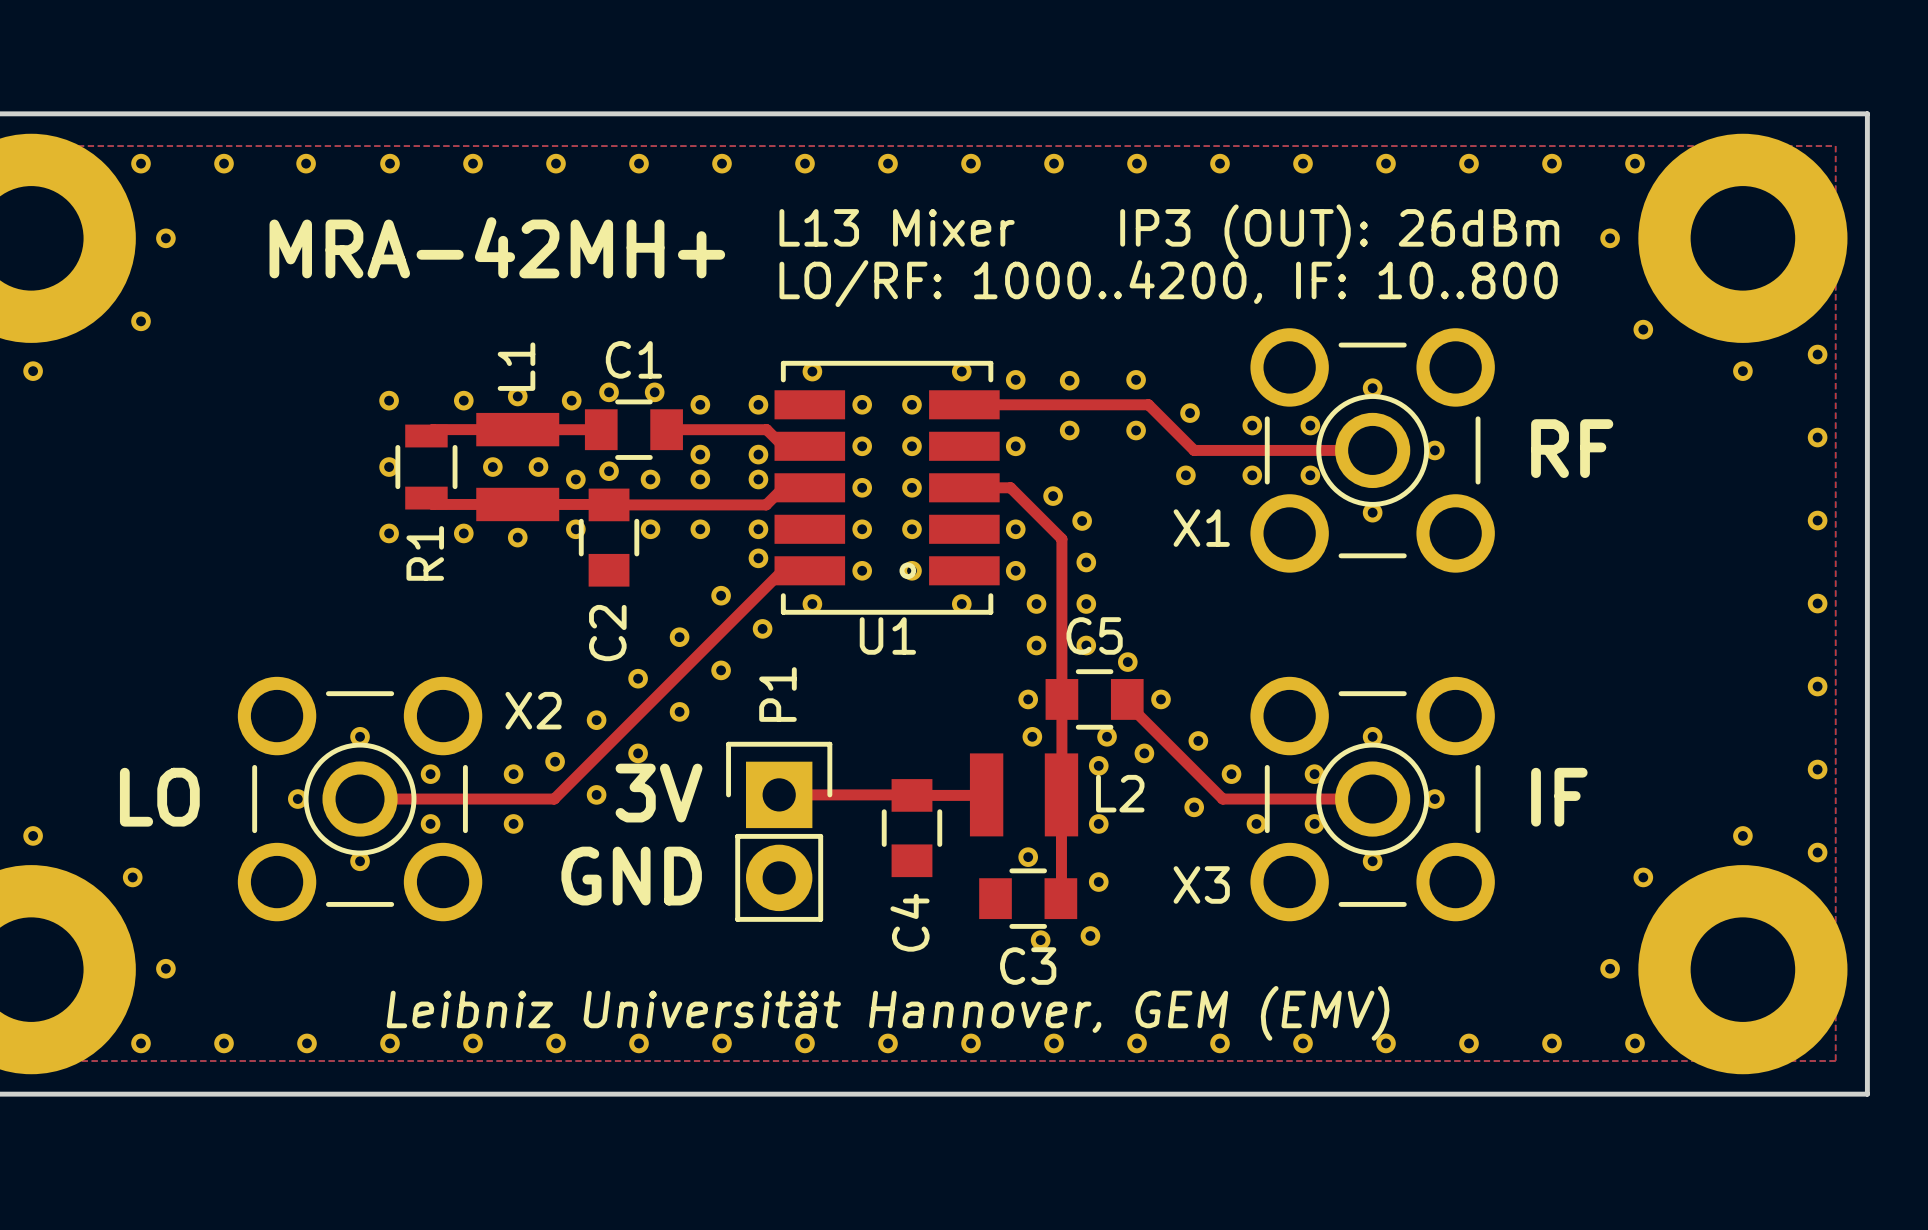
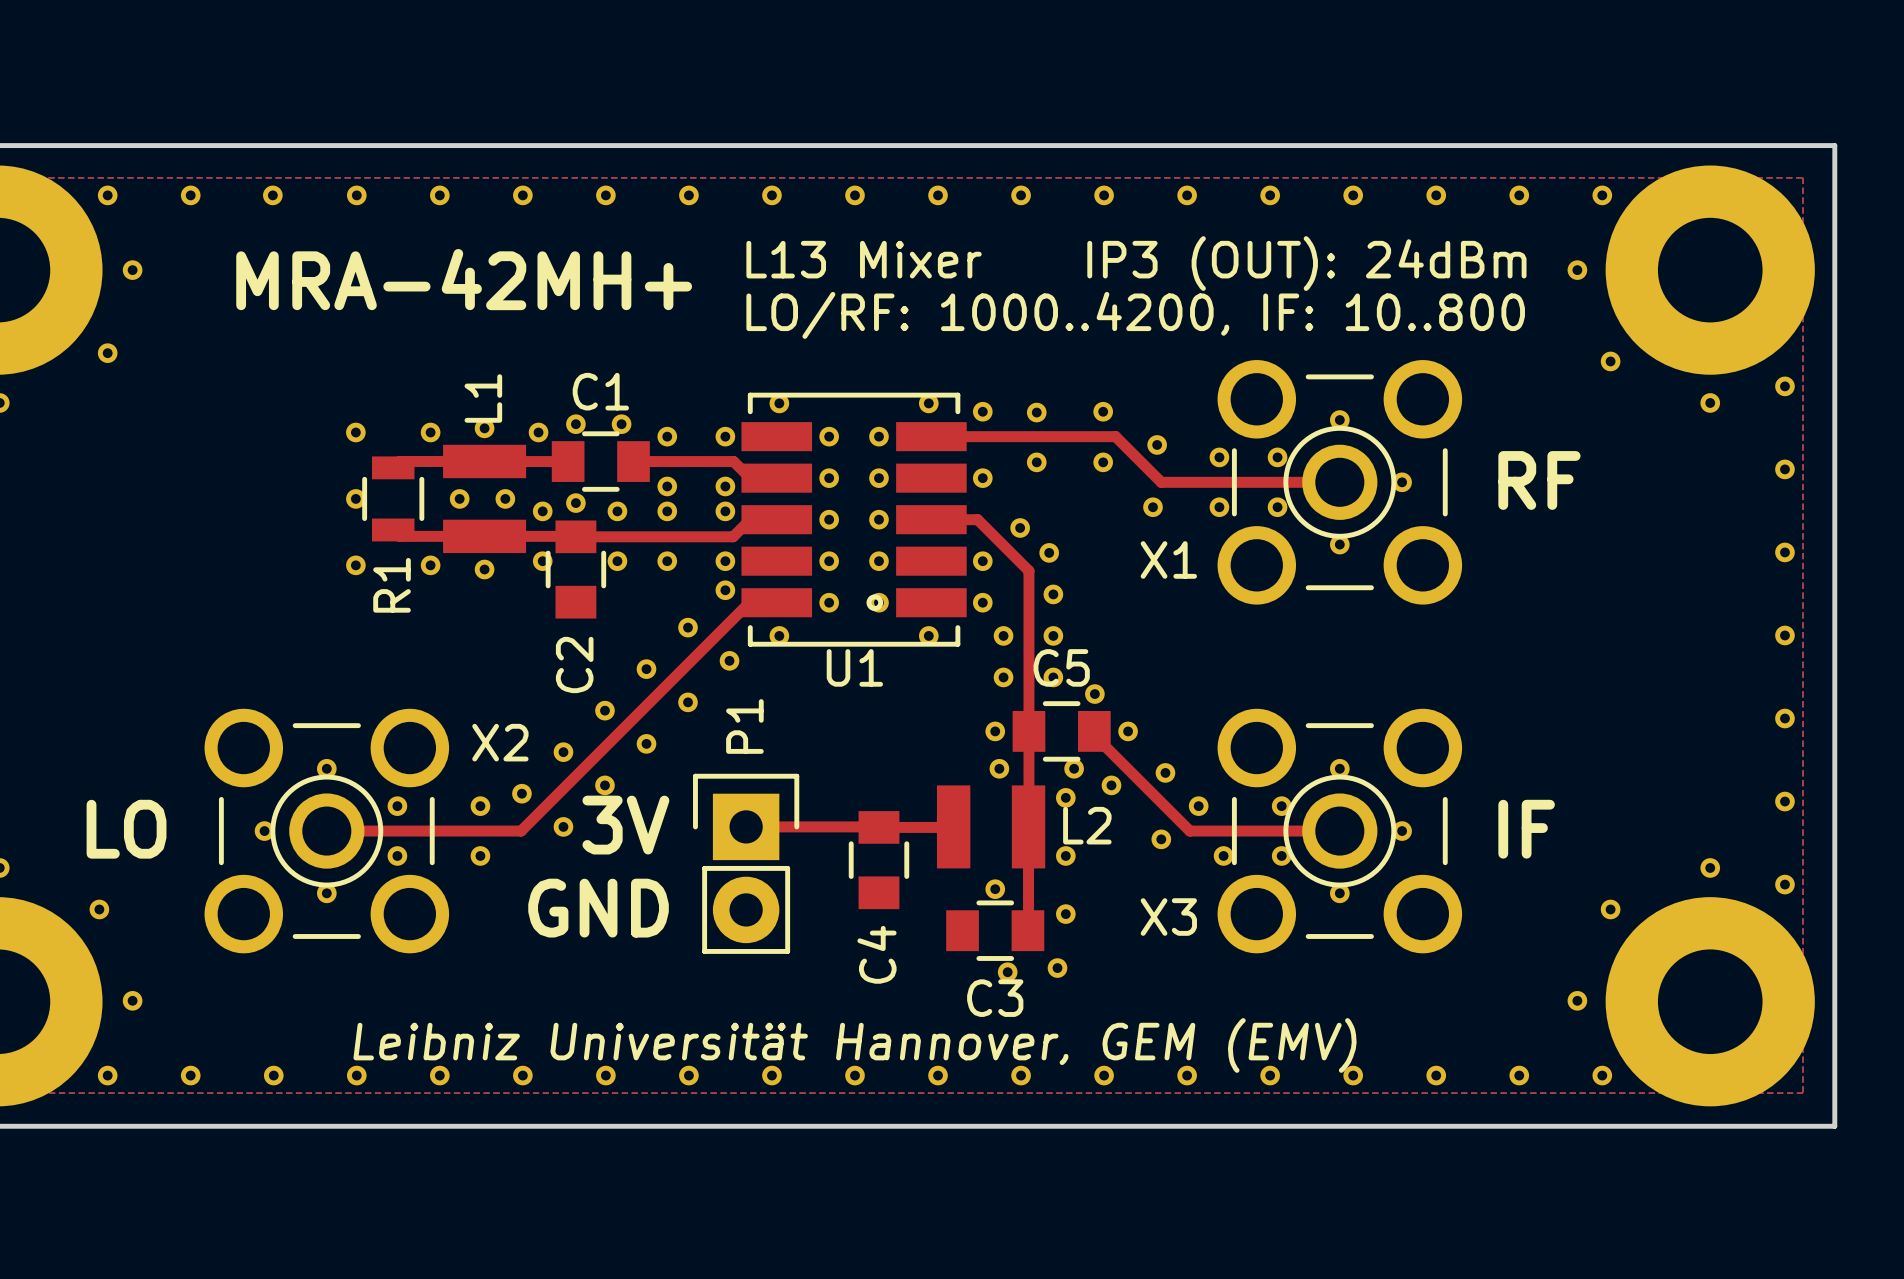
text: L13 Mixer IP3 (OUT): 26dBm (1169, 231) -> L13 Mixer IP3 (OUT): 24dBm (1136, 263)

